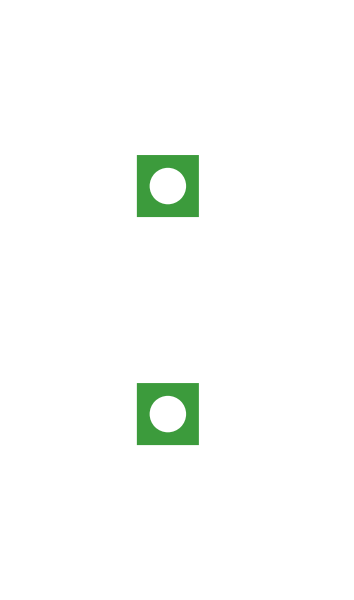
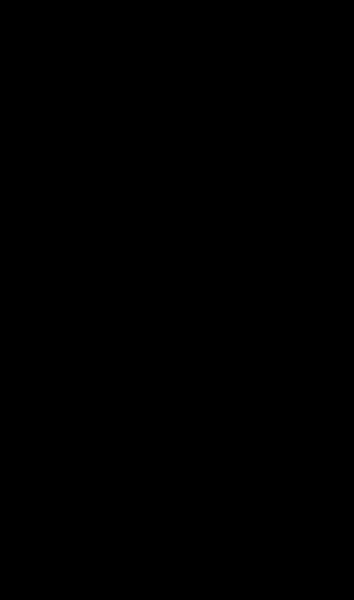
part: (167, 186) -> none
part: (167, 414) -> none

